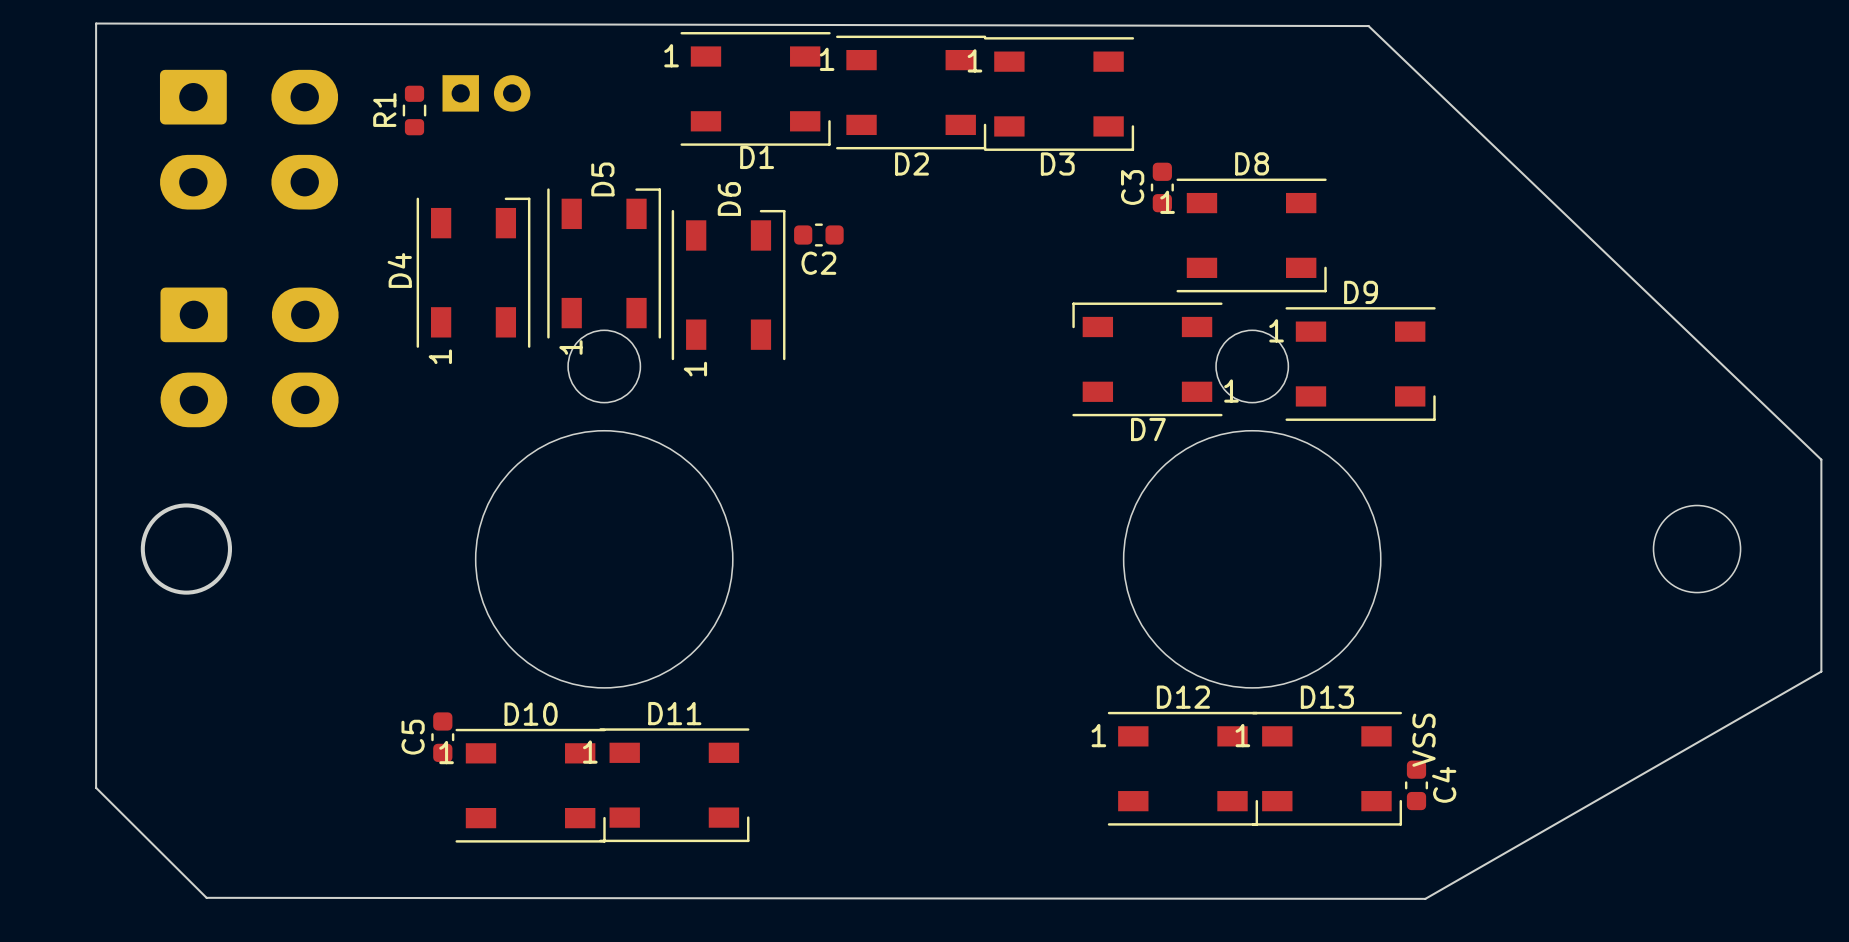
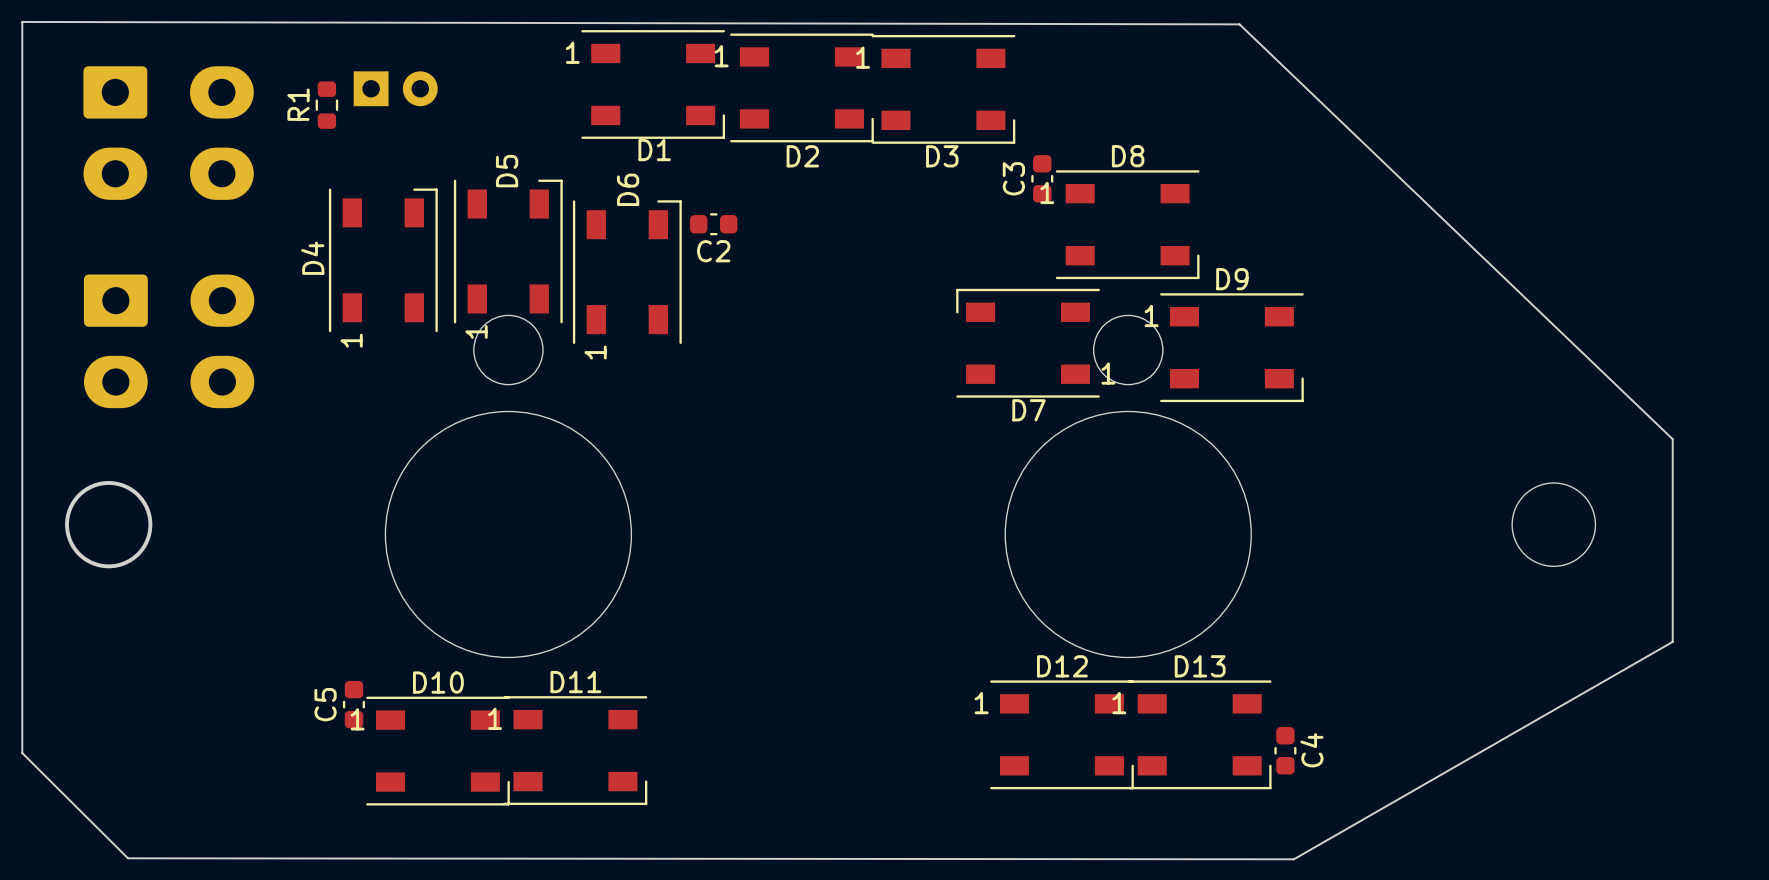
text: VSS (1424, 740) -> none

